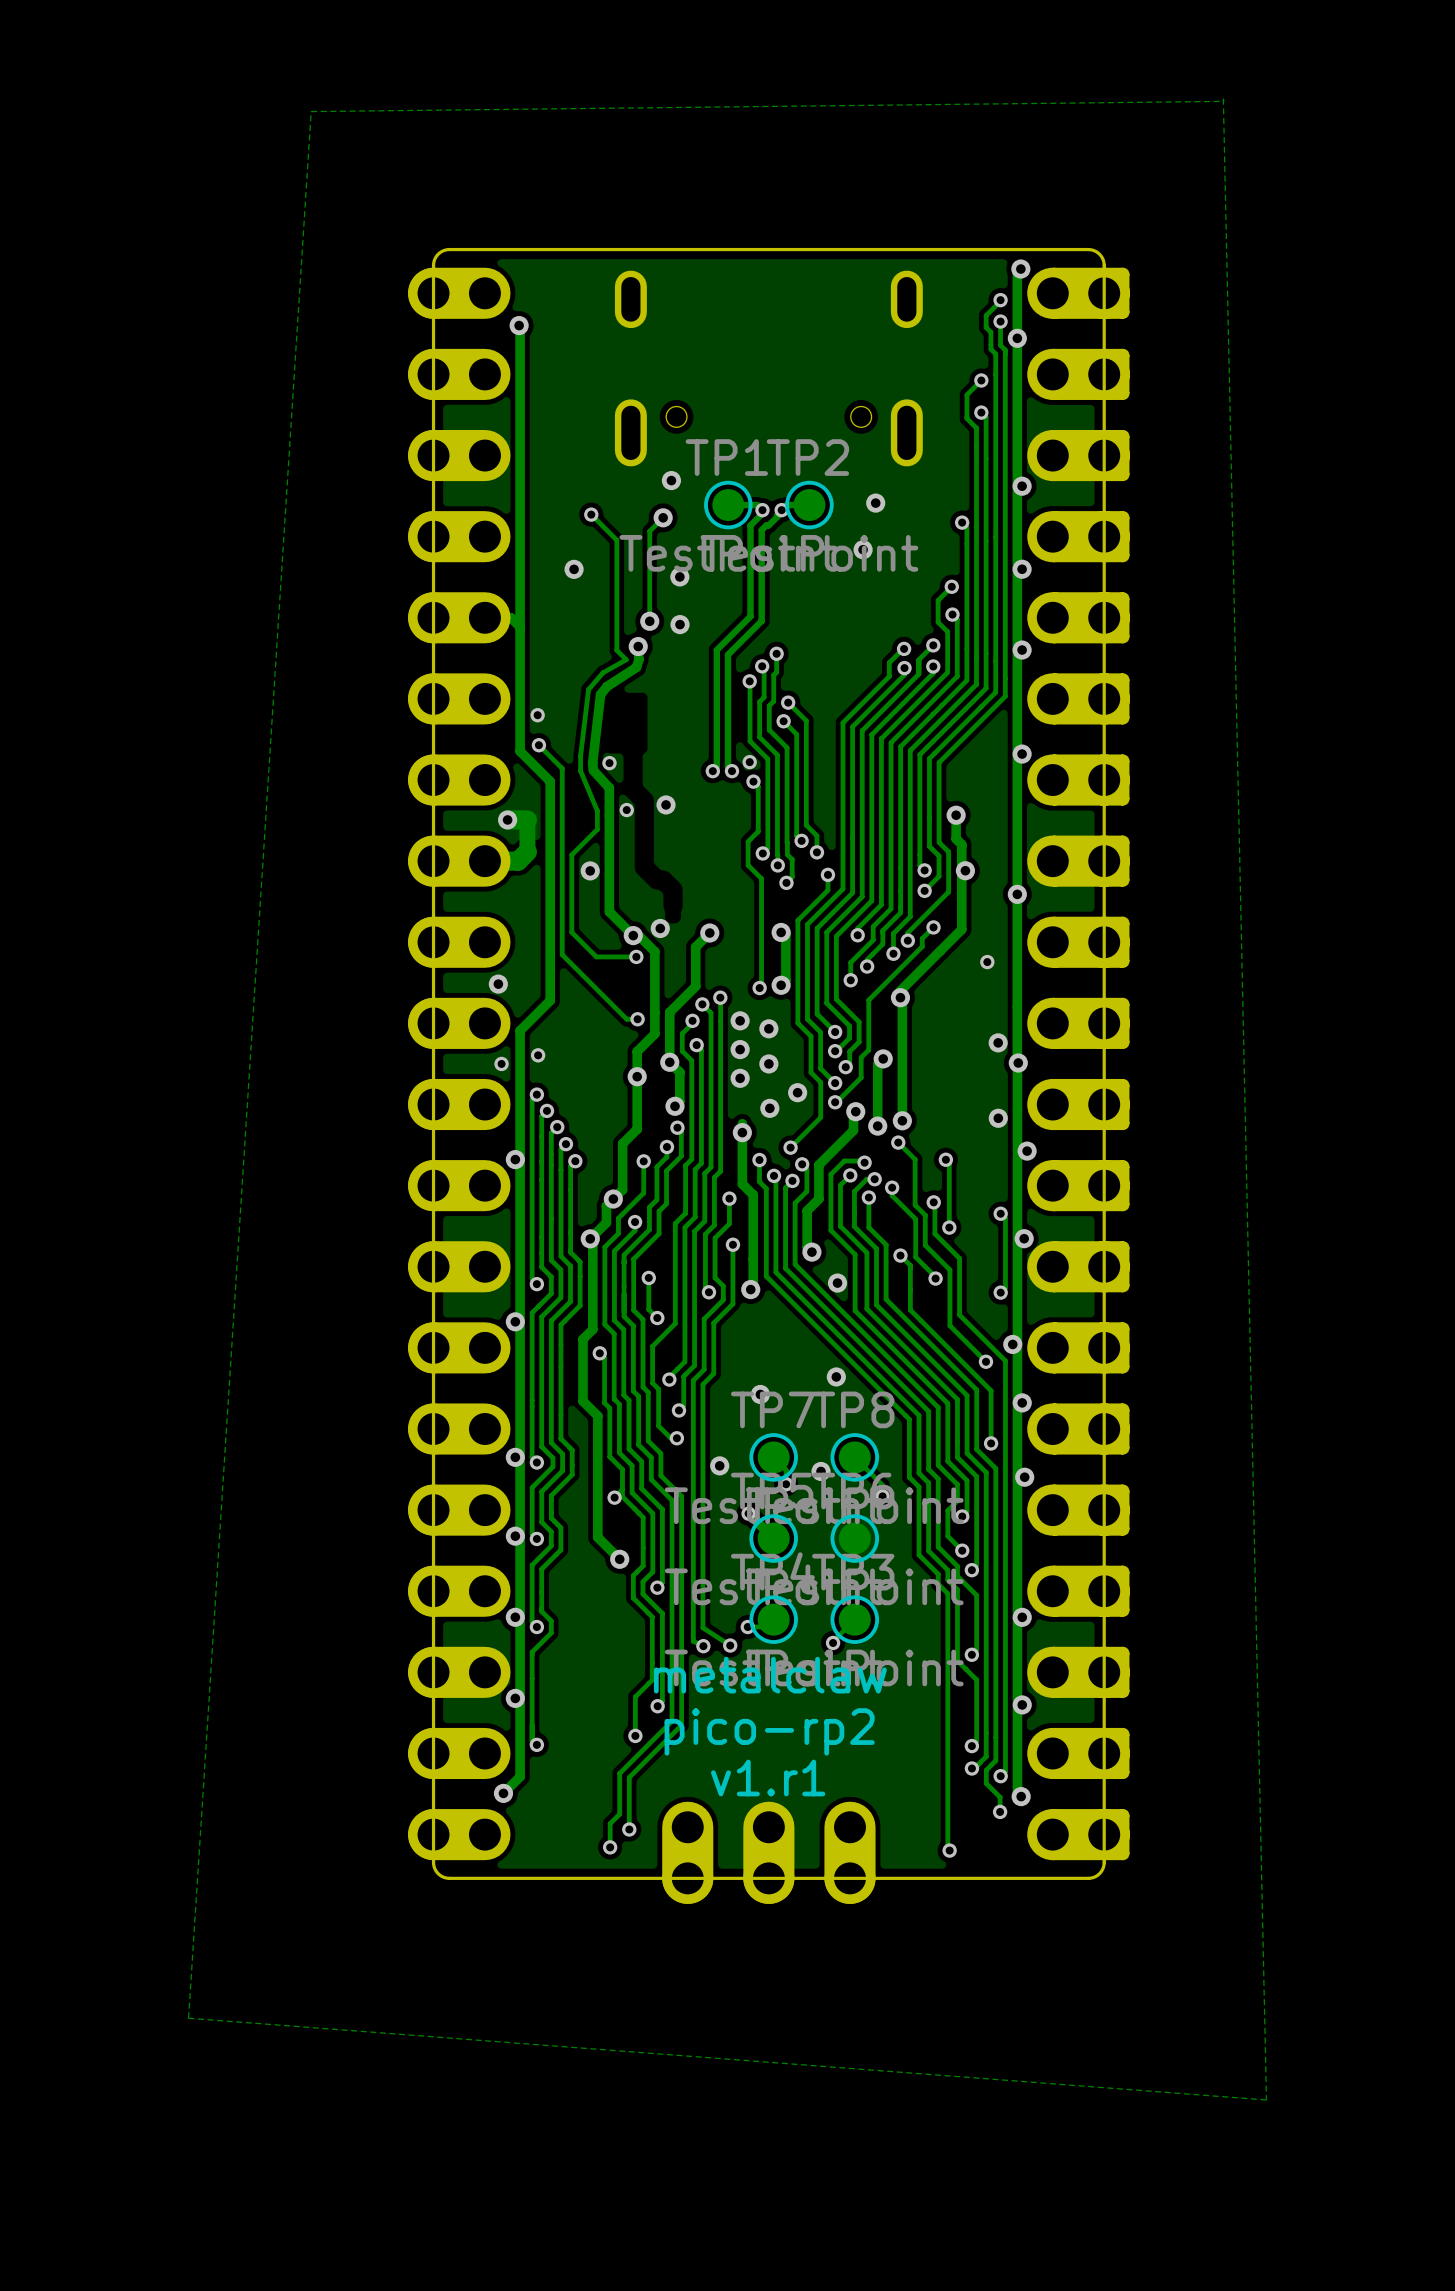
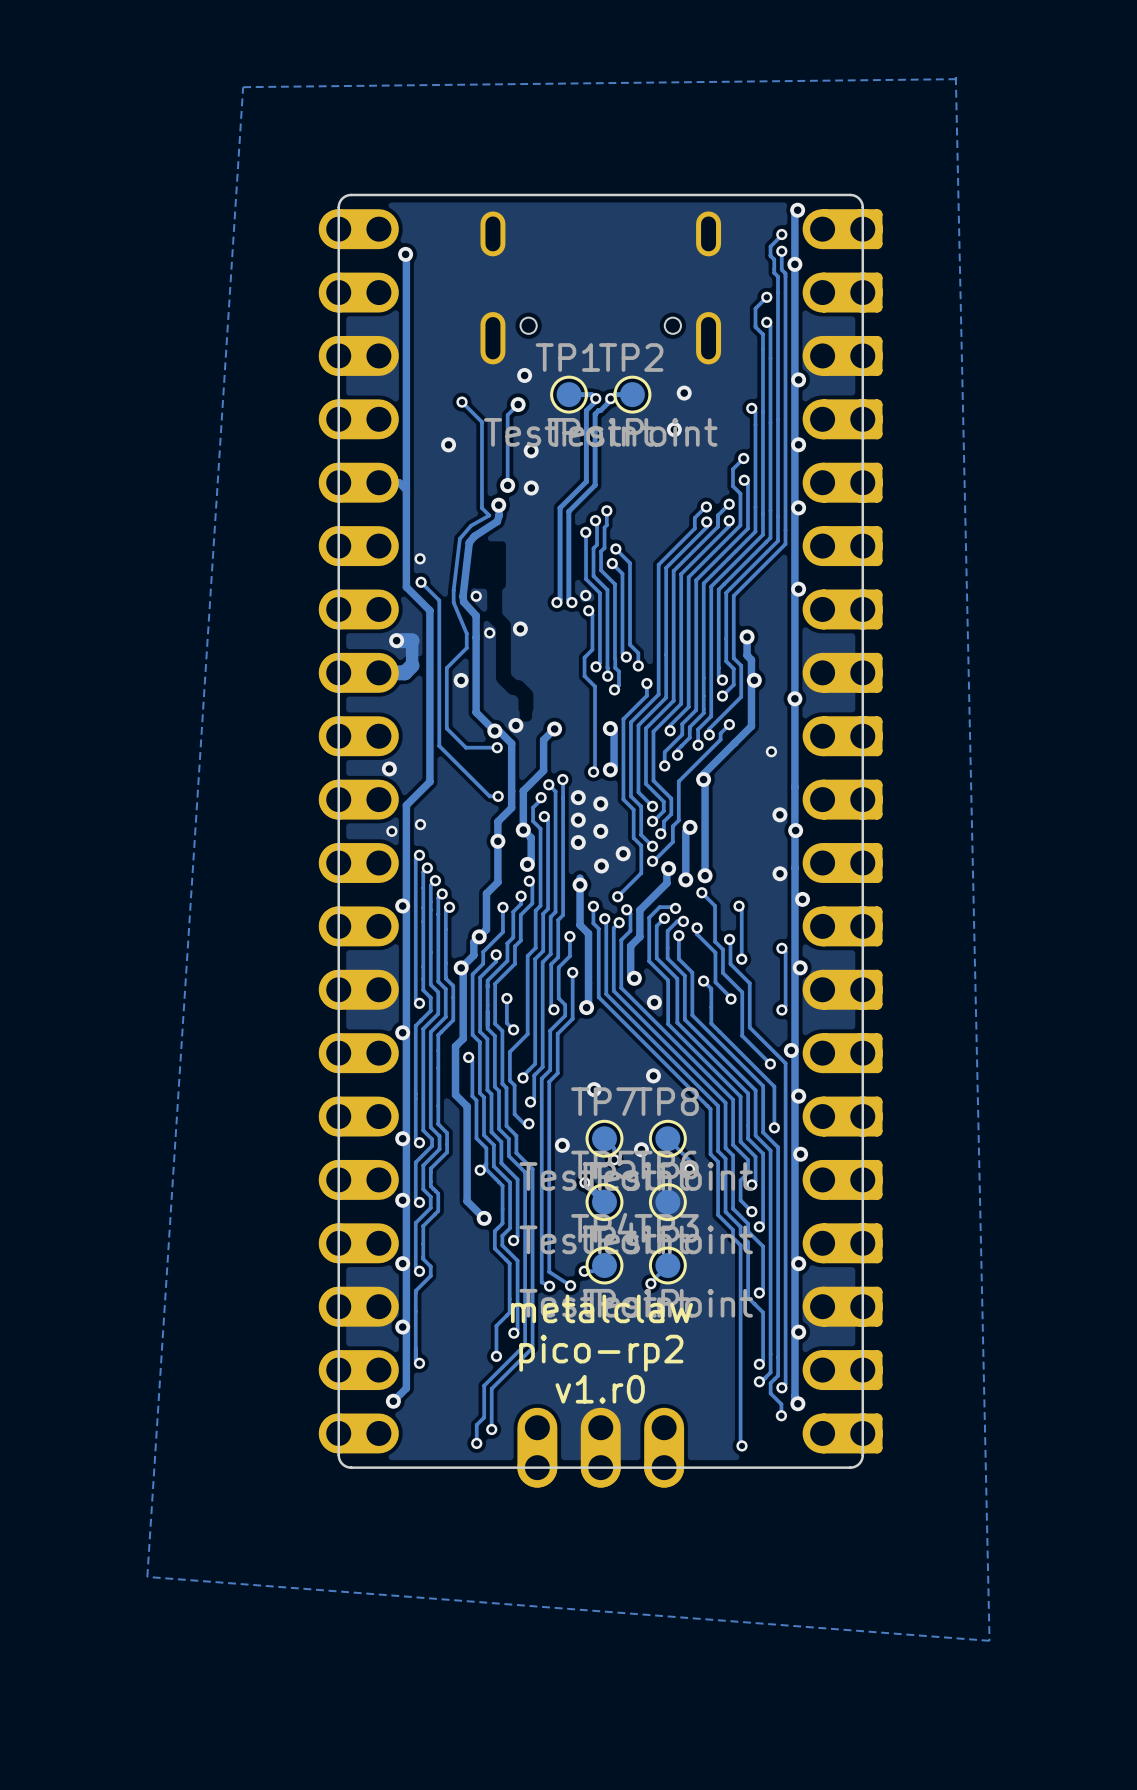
text: v1.r1 (768, 1778) -> v1.r0 (600, 1389)

